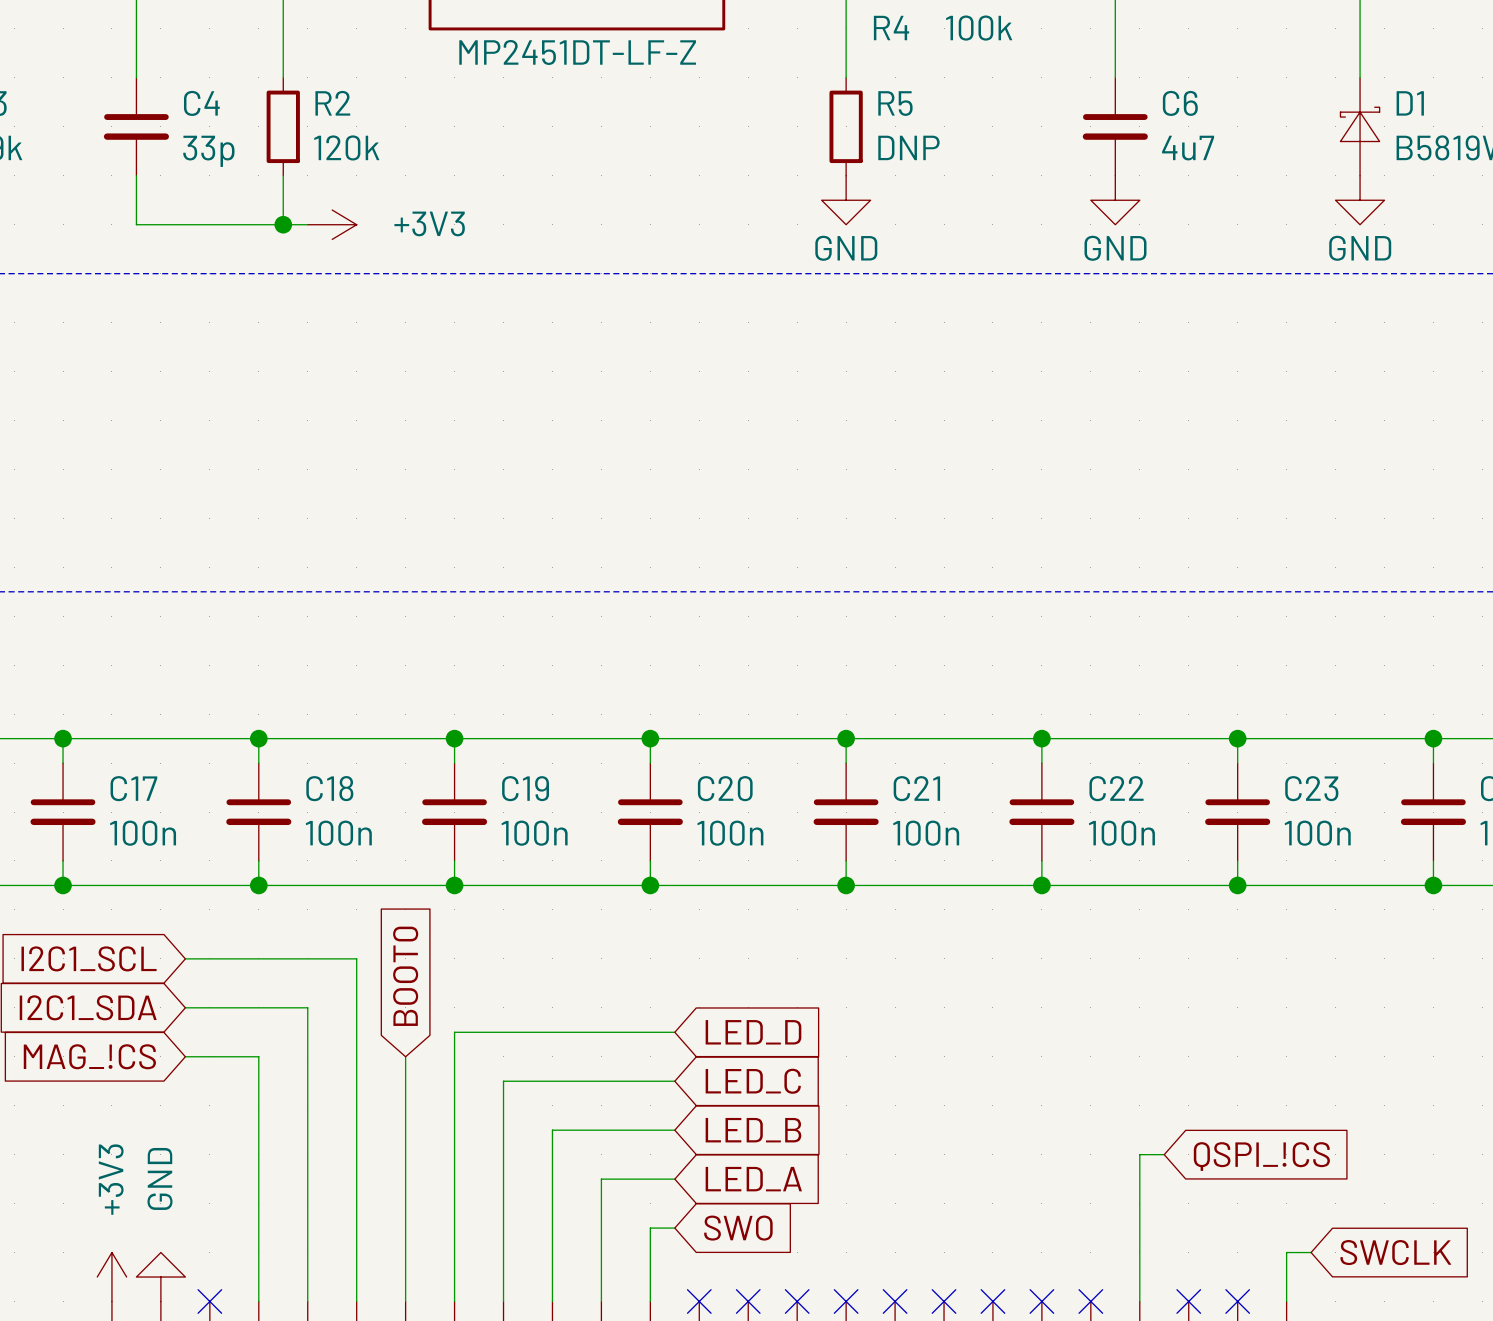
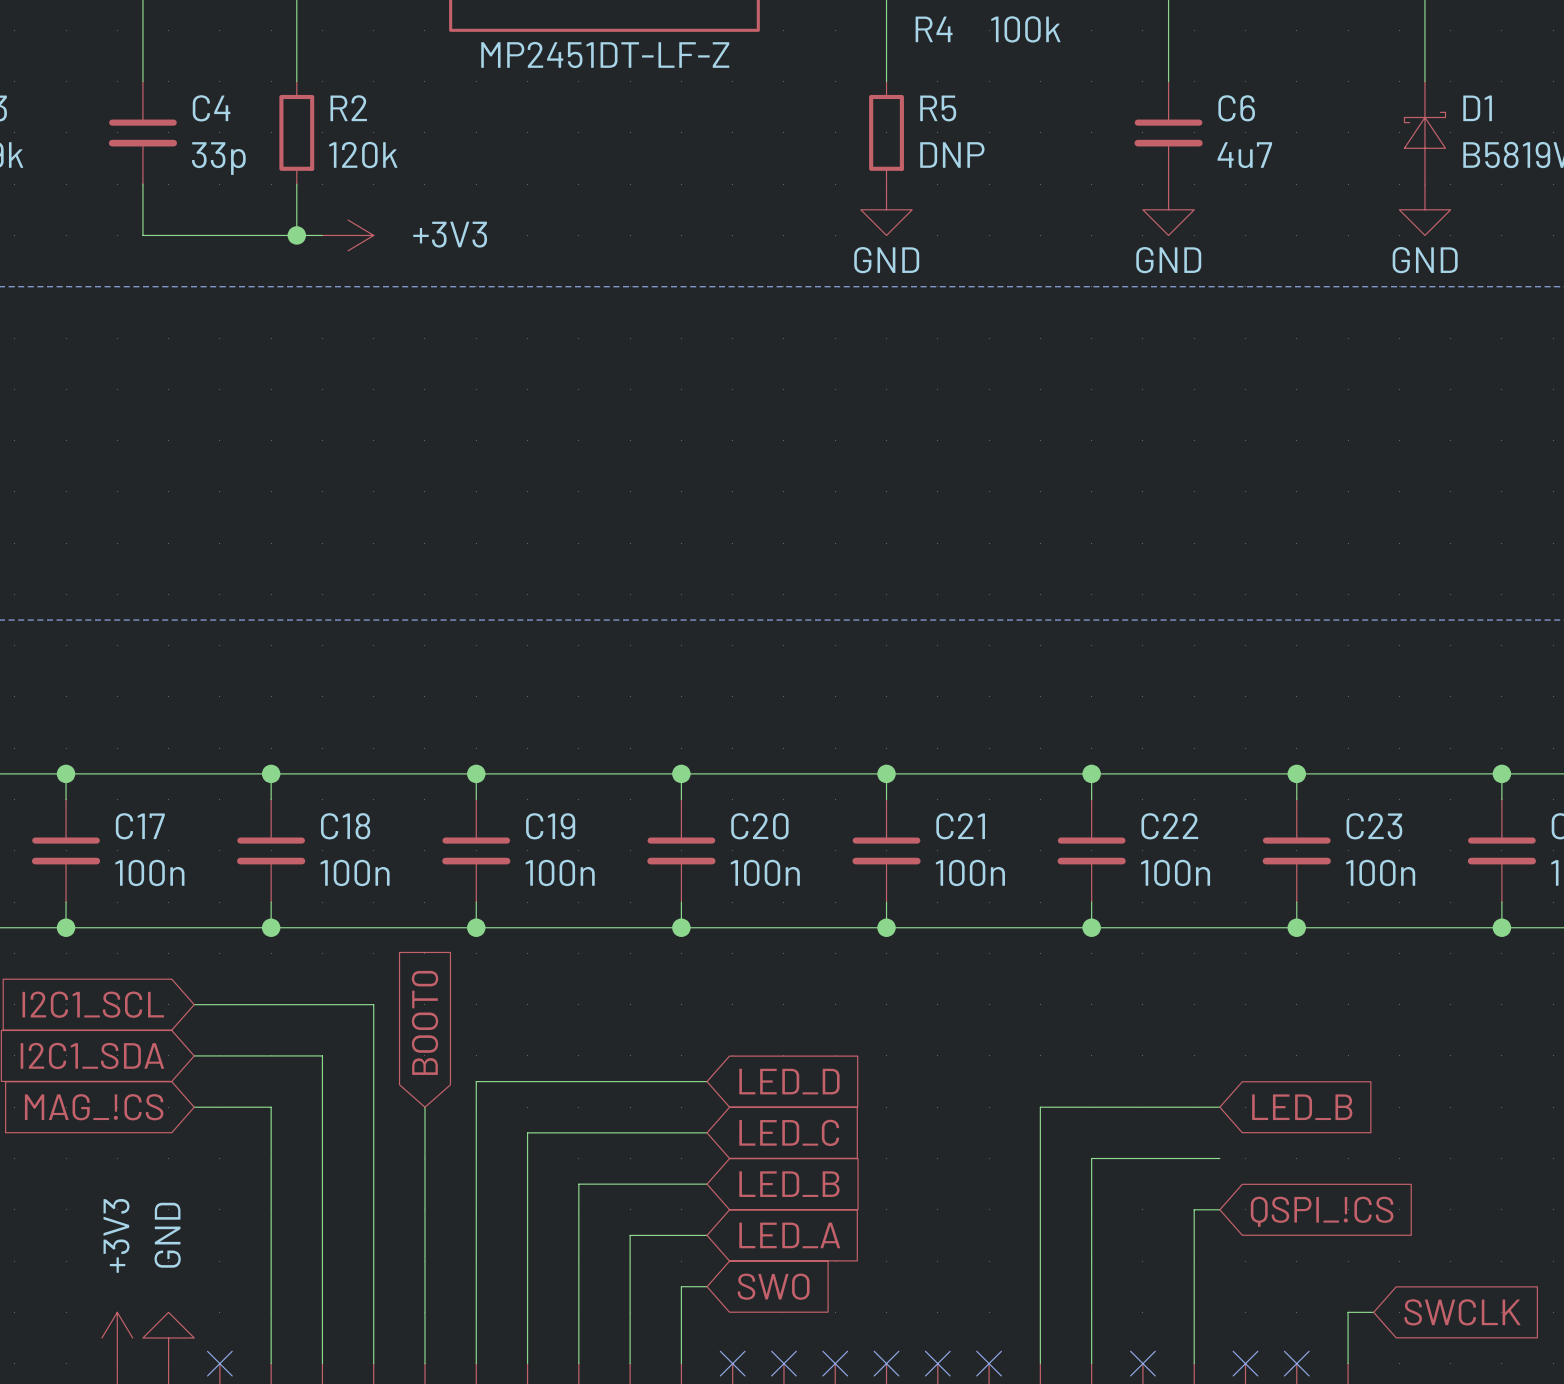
wire: none -> (1219, 1107) (1040, 1107) (1040, 1363)
global label: none -> LED_B (1302, 1107)
wire: none -> (1219, 1158) (1091, 1158) (1091, 1363)
no-connect mark: (992, 1301) -> none
no-connect mark: (1041, 1301) -> none

